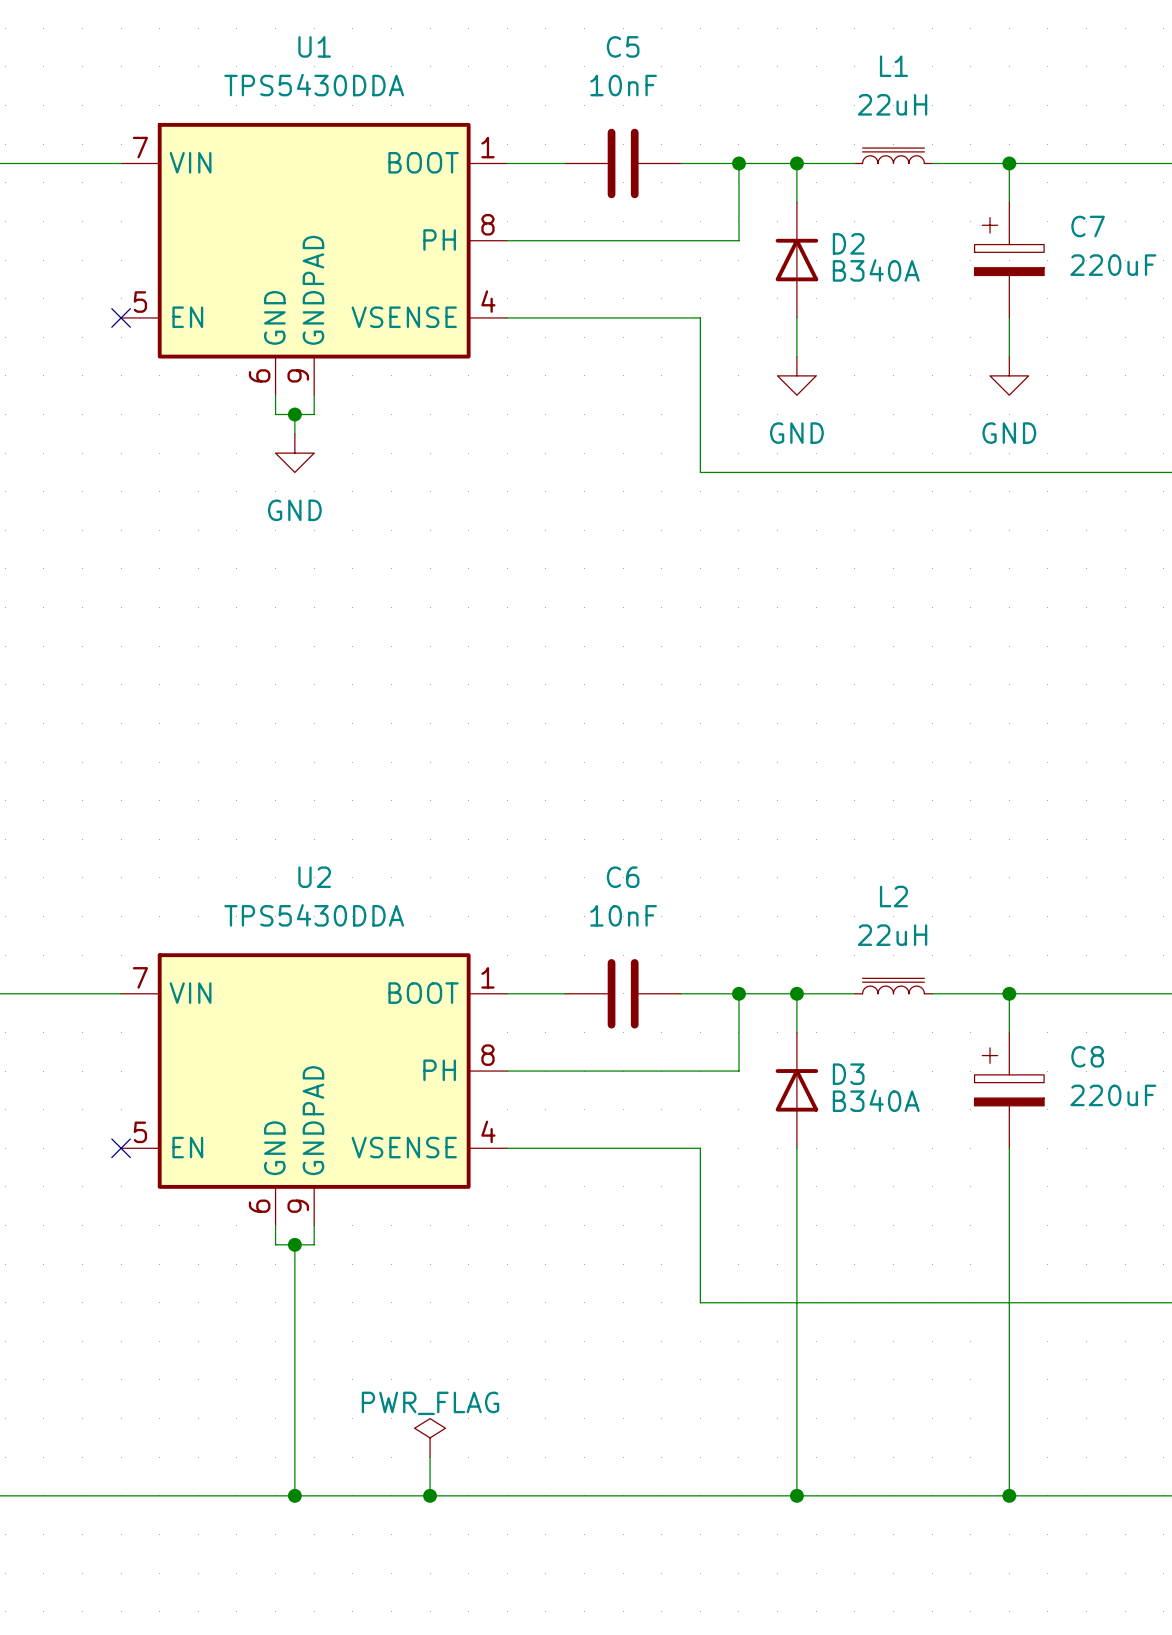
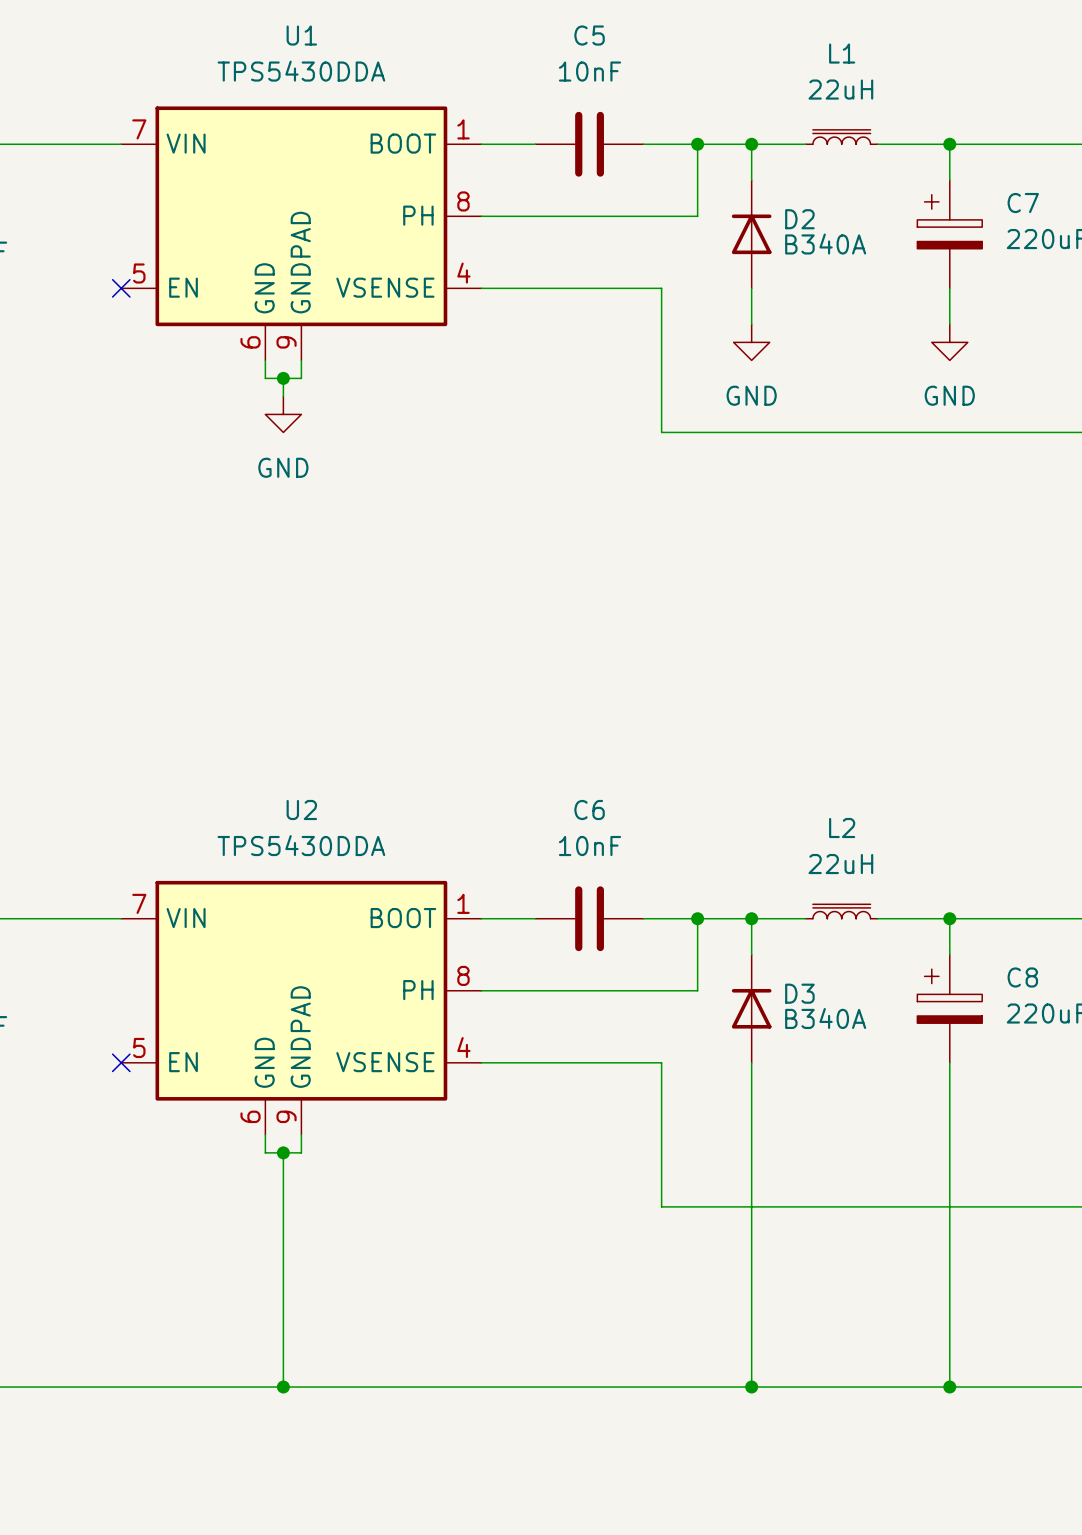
power symbol: PWR_FLAG (430, 1437) -> none
wire: (430, 1457) (430, 1495) -> none
junction: (430, 1495) -> none

